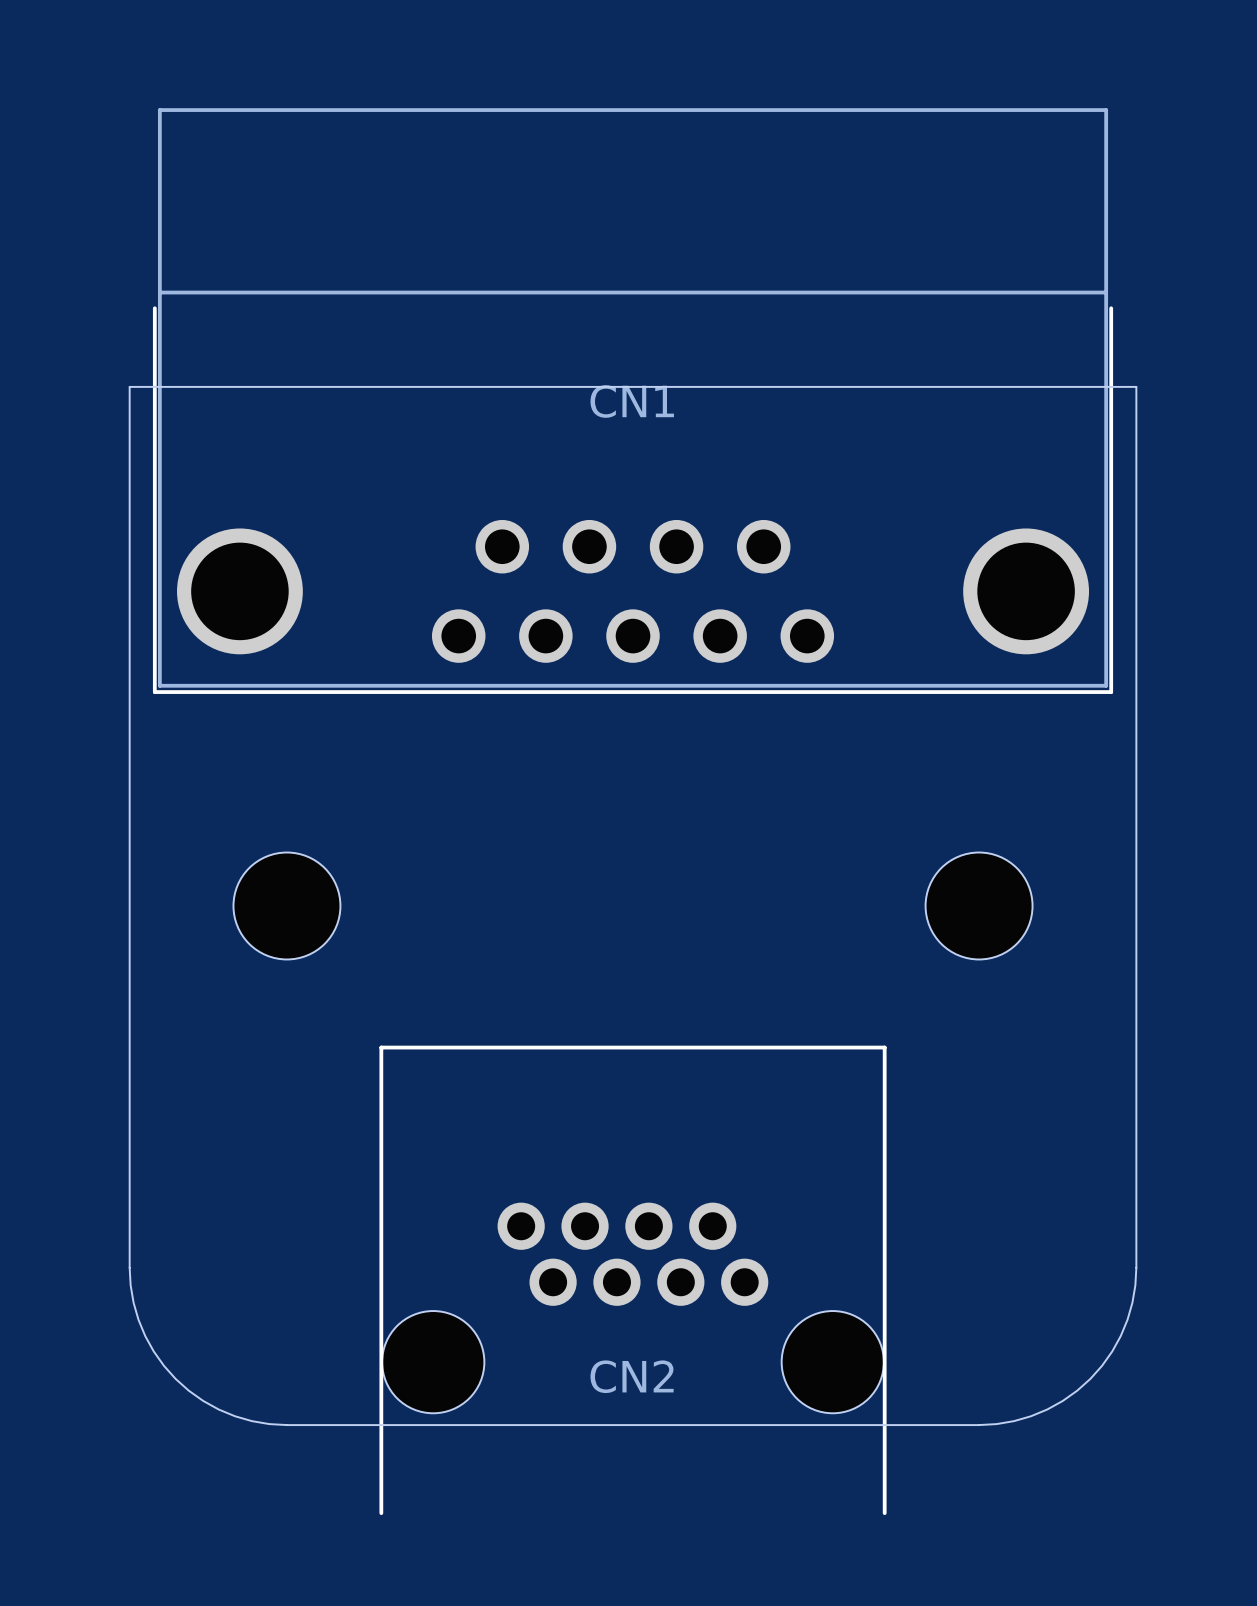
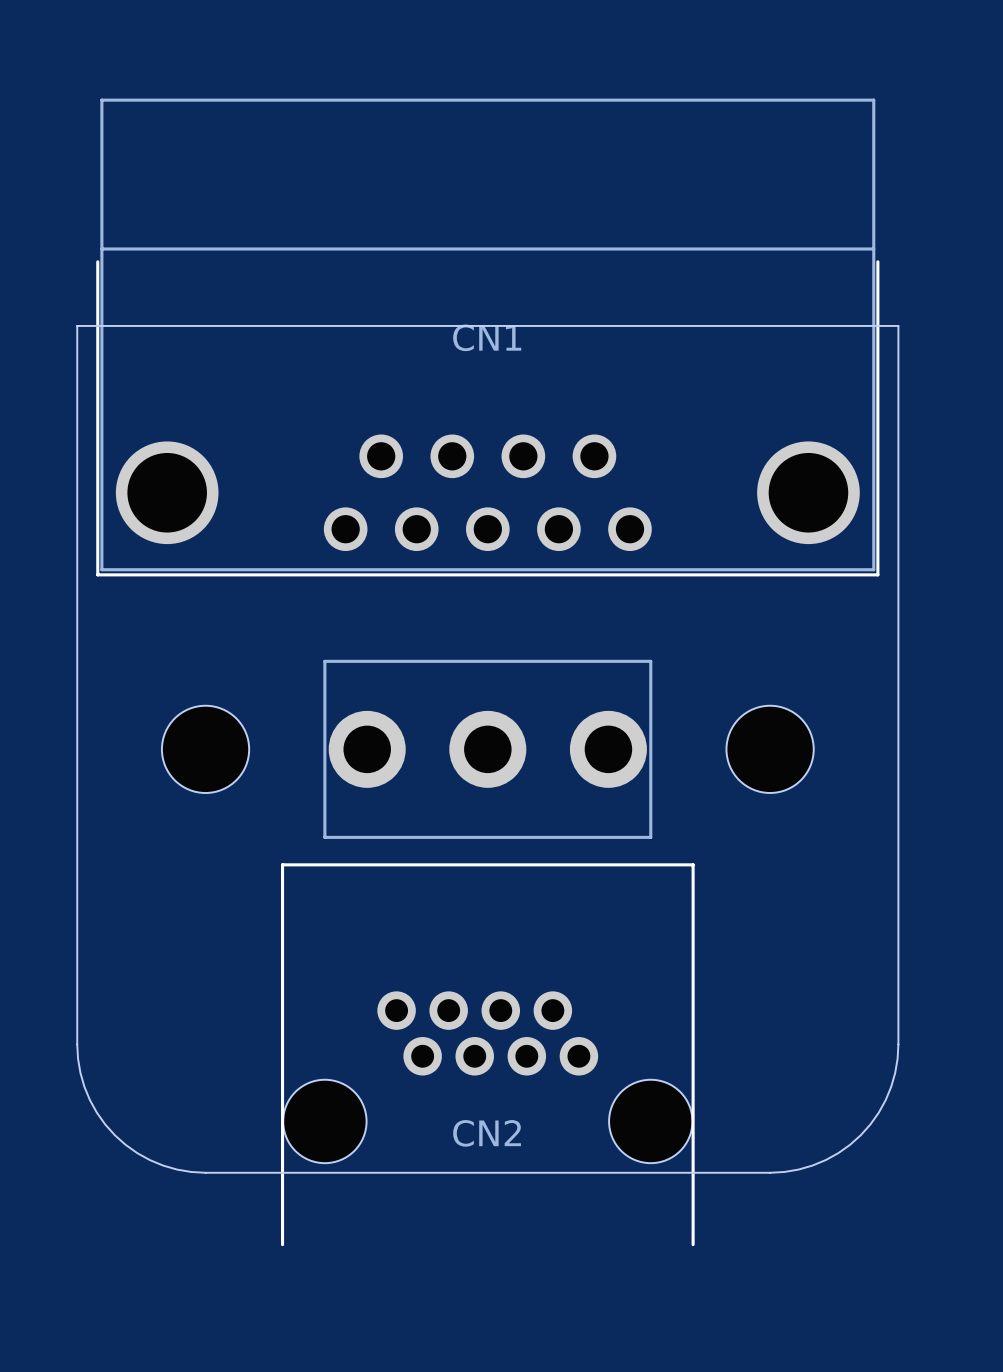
part: none -> (487, 749)

